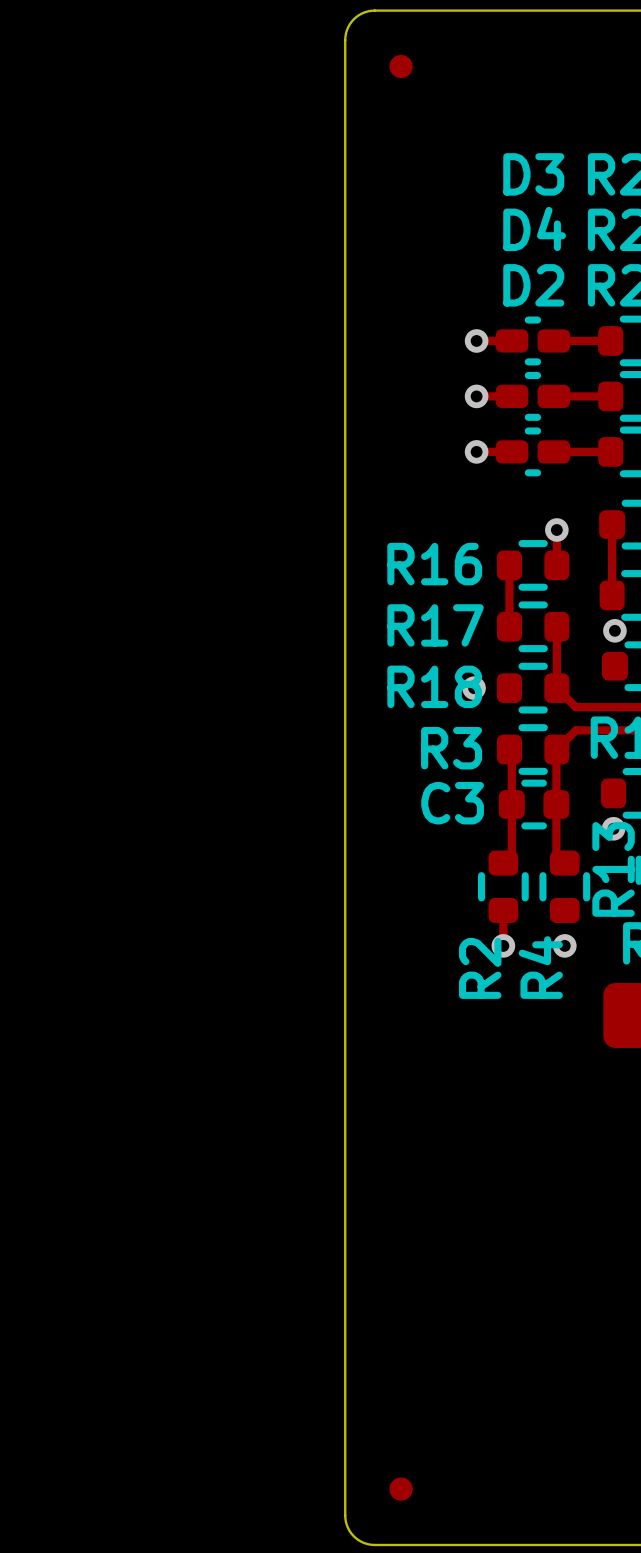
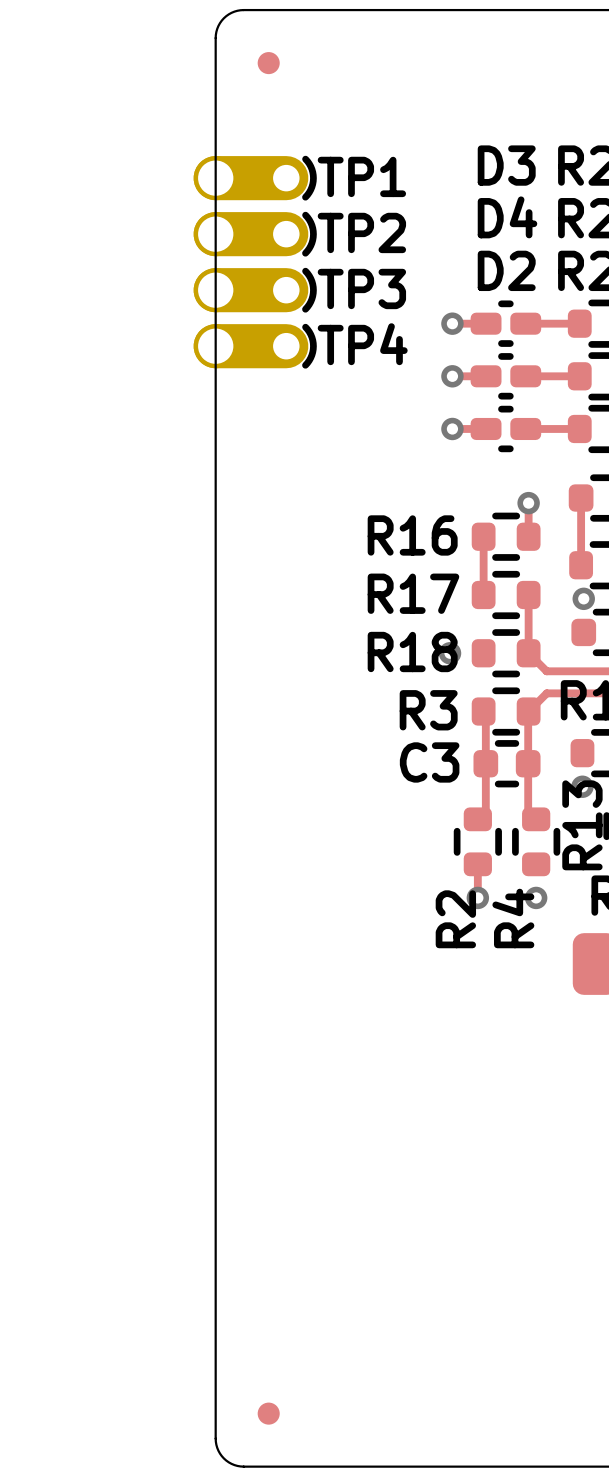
board edge: (374, 10) (364, 12) (353, 19) (348, 27) (345, 40) (345, 1515) (348, 1528) (353, 1536) (361, 1542) (374, 1544) -> (355, 10) (237, 10) (228, 14) (221, 20) (217, 28) (215, 38) (215, 1441) (218, 1450) (223, 1458) (237, 1465) (355, 1466)
part position: (401, 66) -> (268, 63)
TP1: none -> (255, 178)
TP2: none -> (255, 234)
TP3: none -> (255, 290)
TP4: none -> (255, 346)
part position: (401, 1489) -> (268, 1413)

